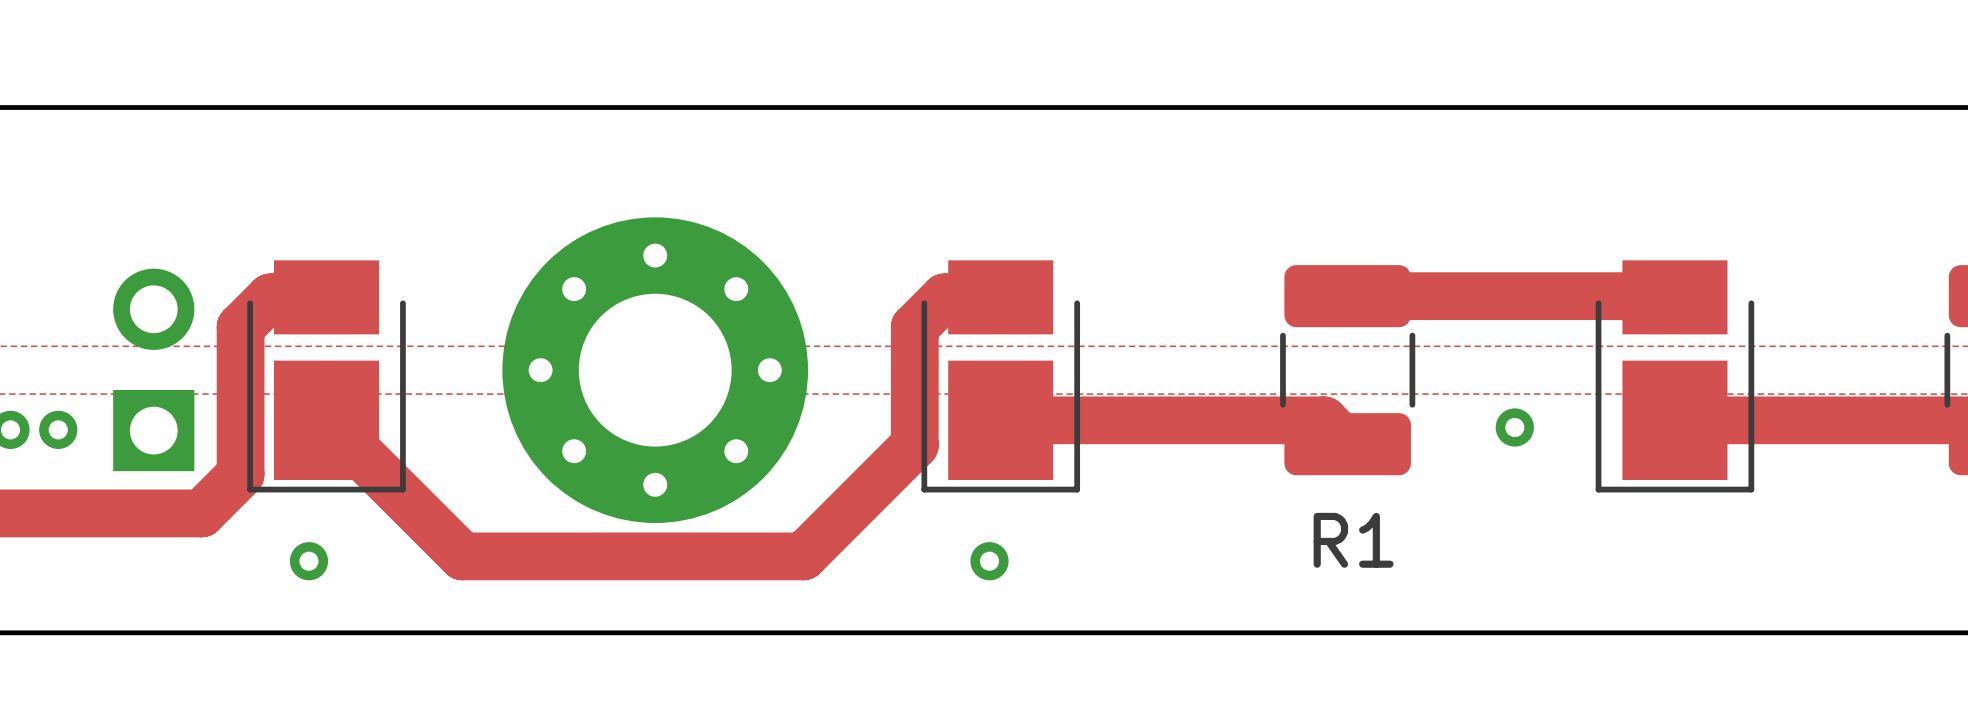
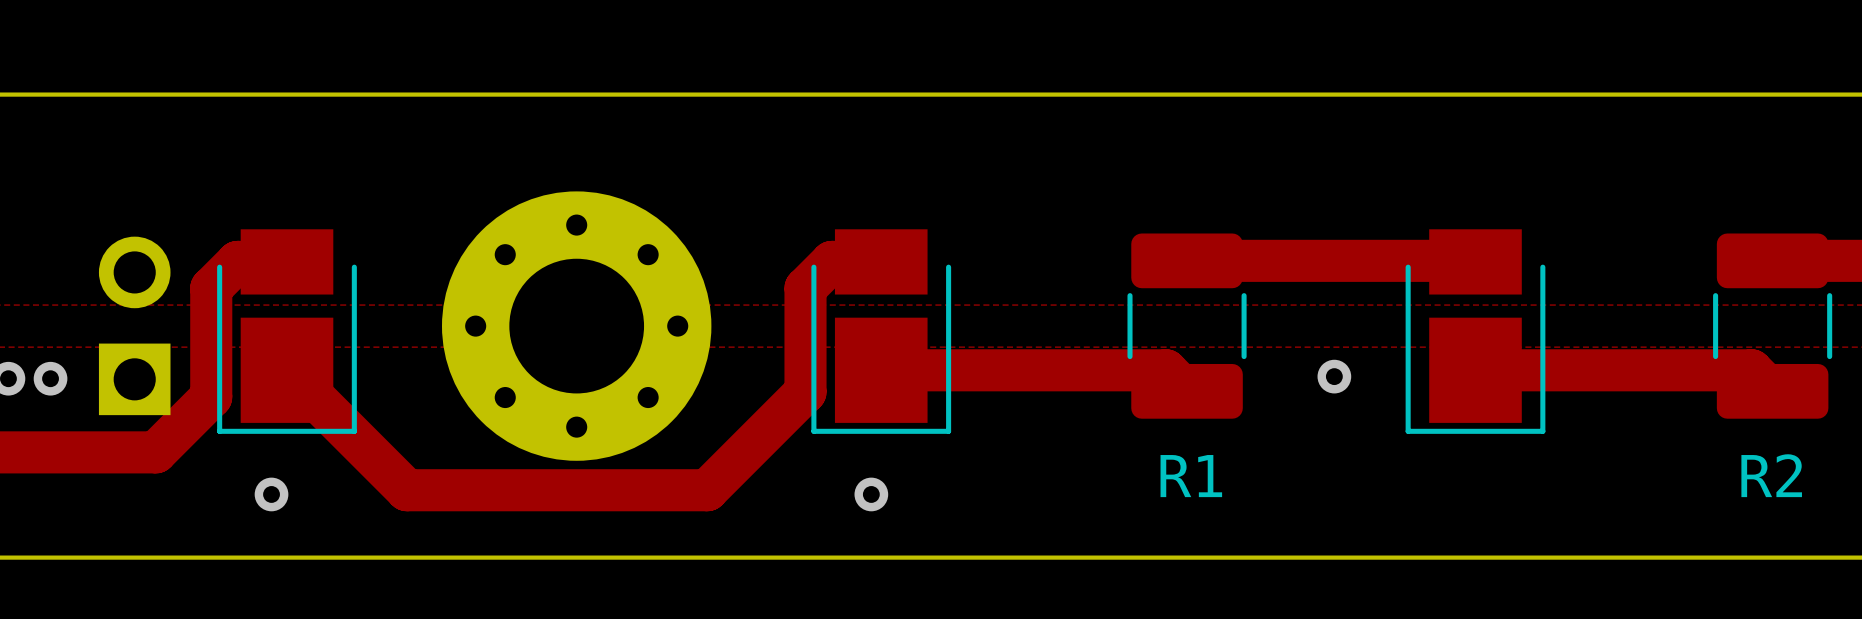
top track: (240, 450) (240, 474) (201, 513) (177, 513) -> (211, 396) (155, 452)

